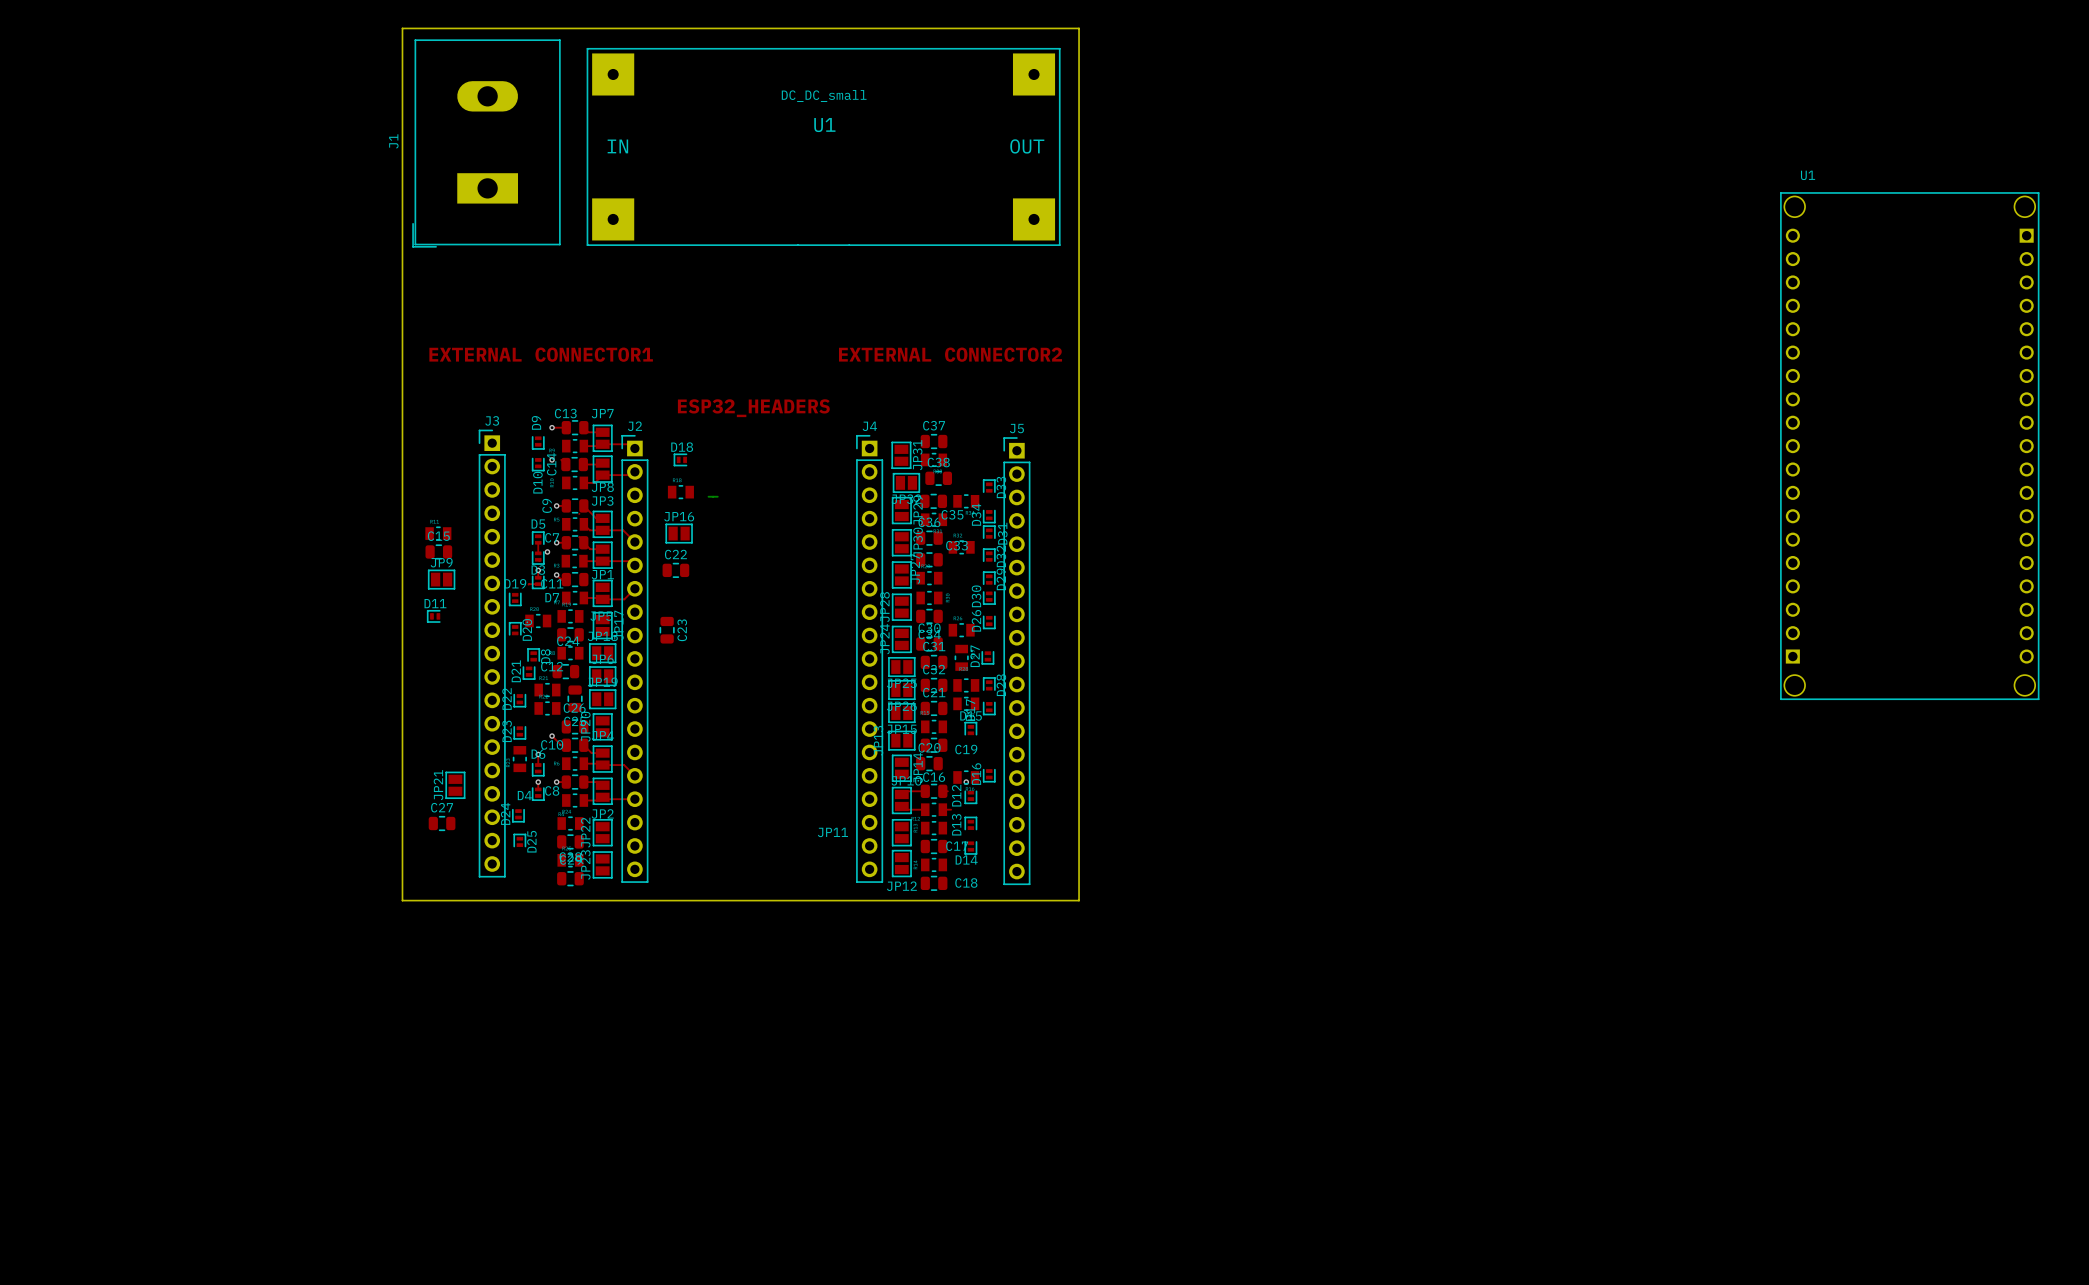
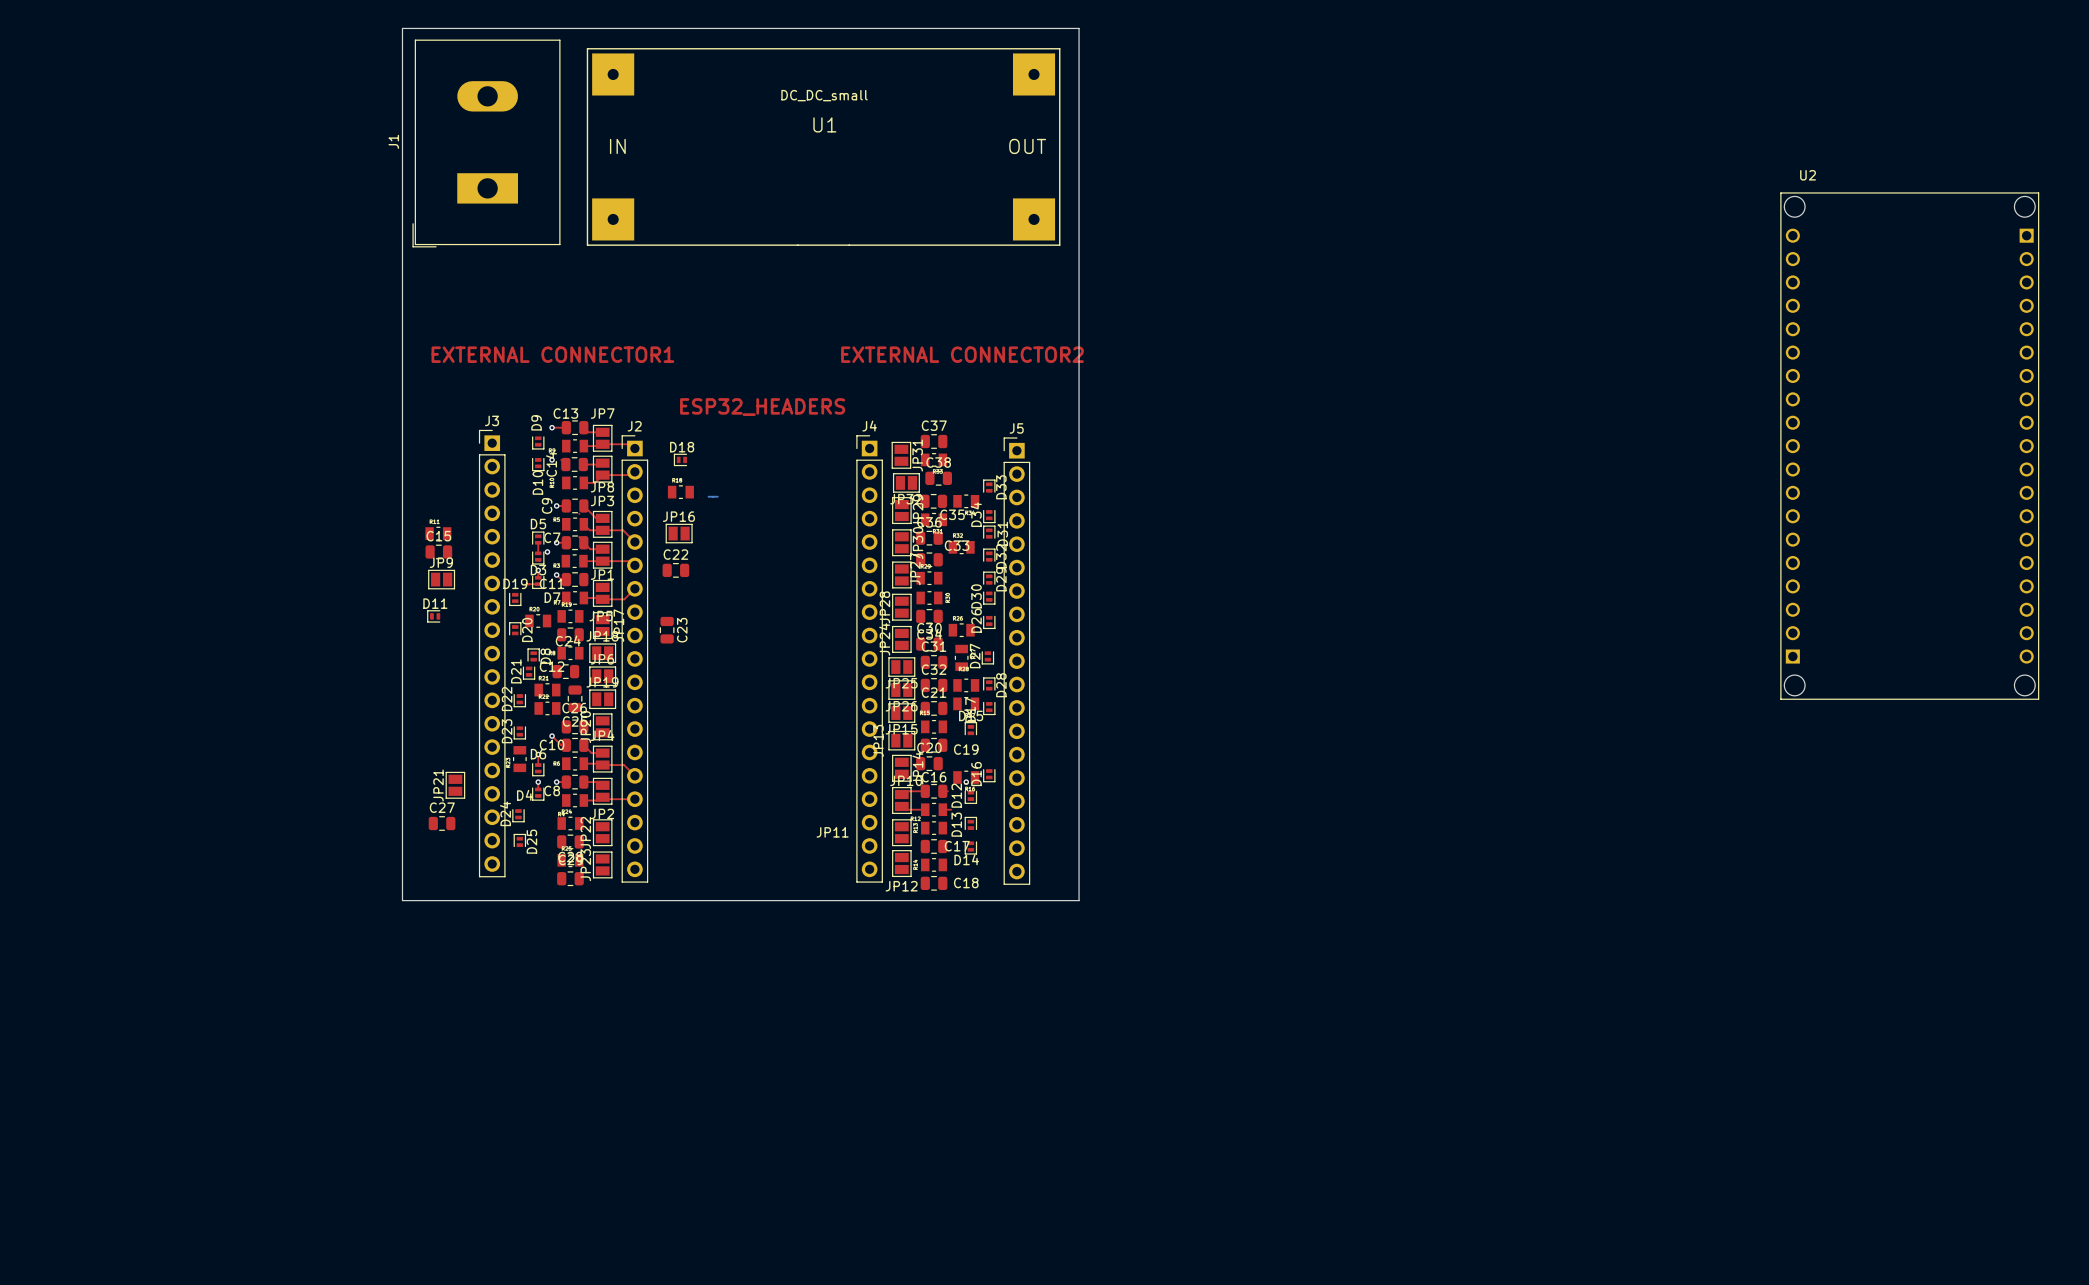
U1 name: U1 (1808, 175) -> U2 (1808, 175)

